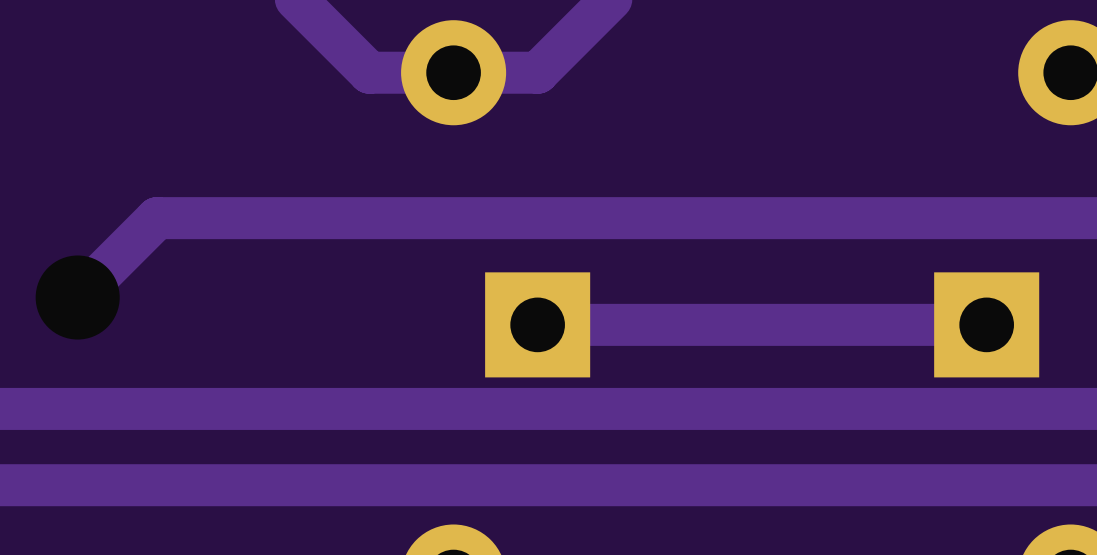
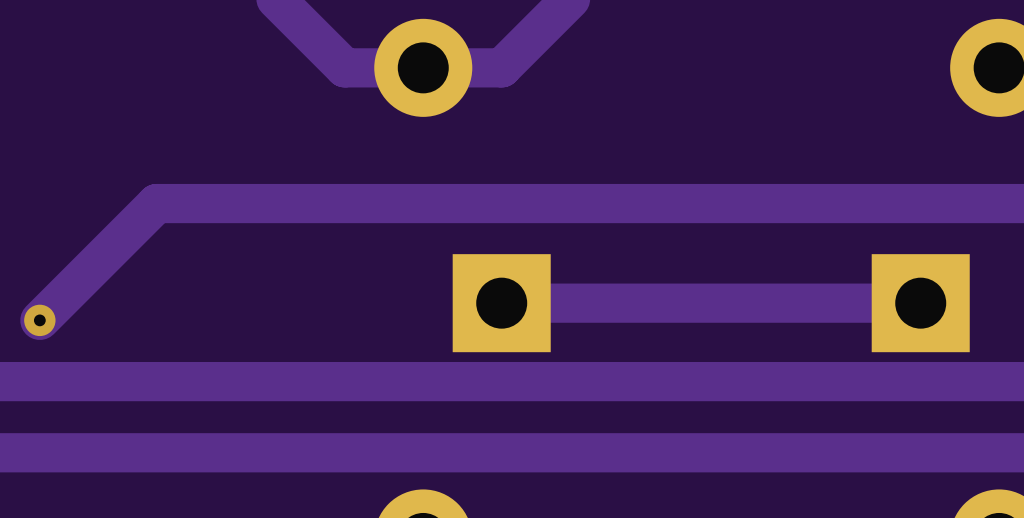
track: (167, 218) (157, 218) (77, 297) -> (156, 203) (39, 320)
via: (77, 297) -> none
via: none -> (39, 320)

